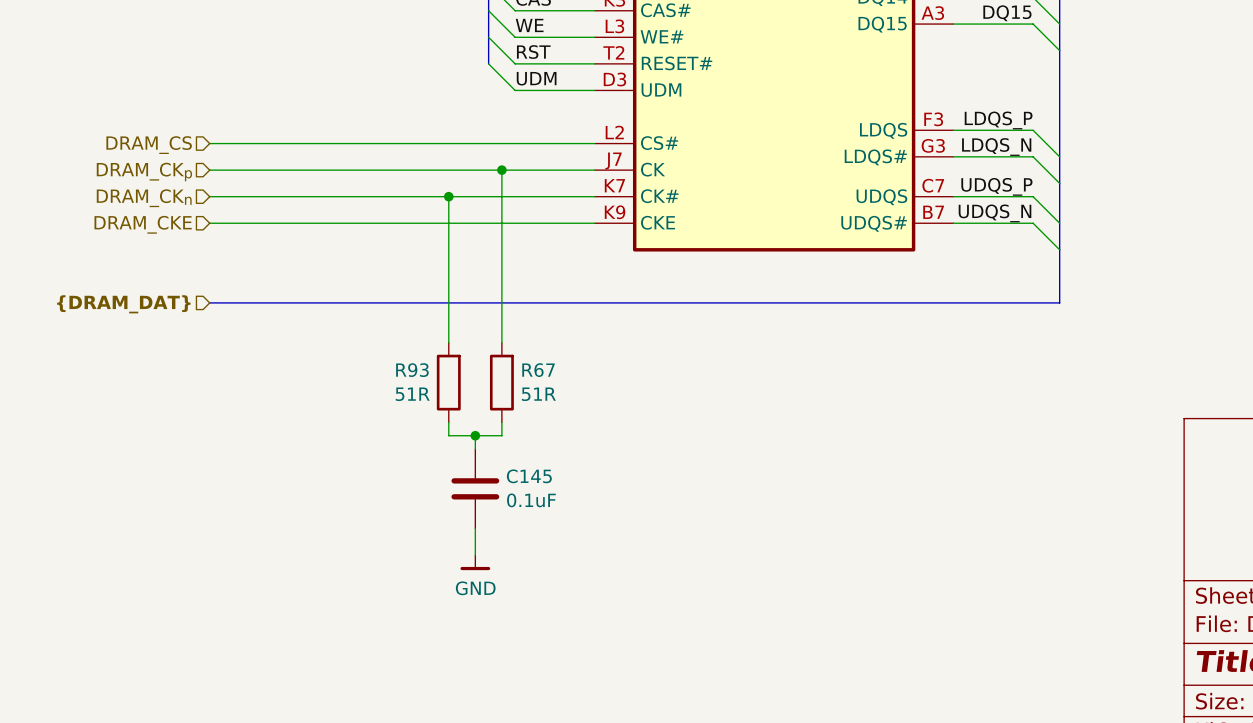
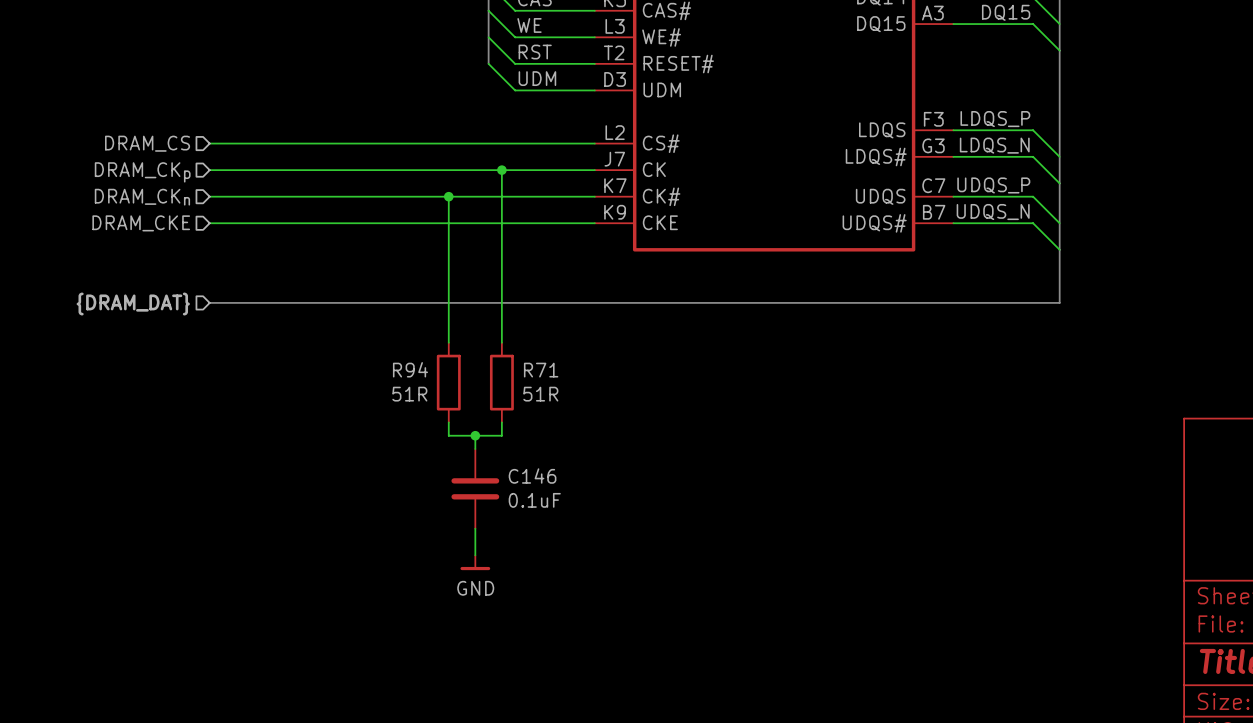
R93 name: R93 (412, 370) -> R94 (410, 369)
R67 name: R67 (538, 370) -> R71 (541, 370)
C145 name: C145 (529, 476) -> C146 (532, 476)

